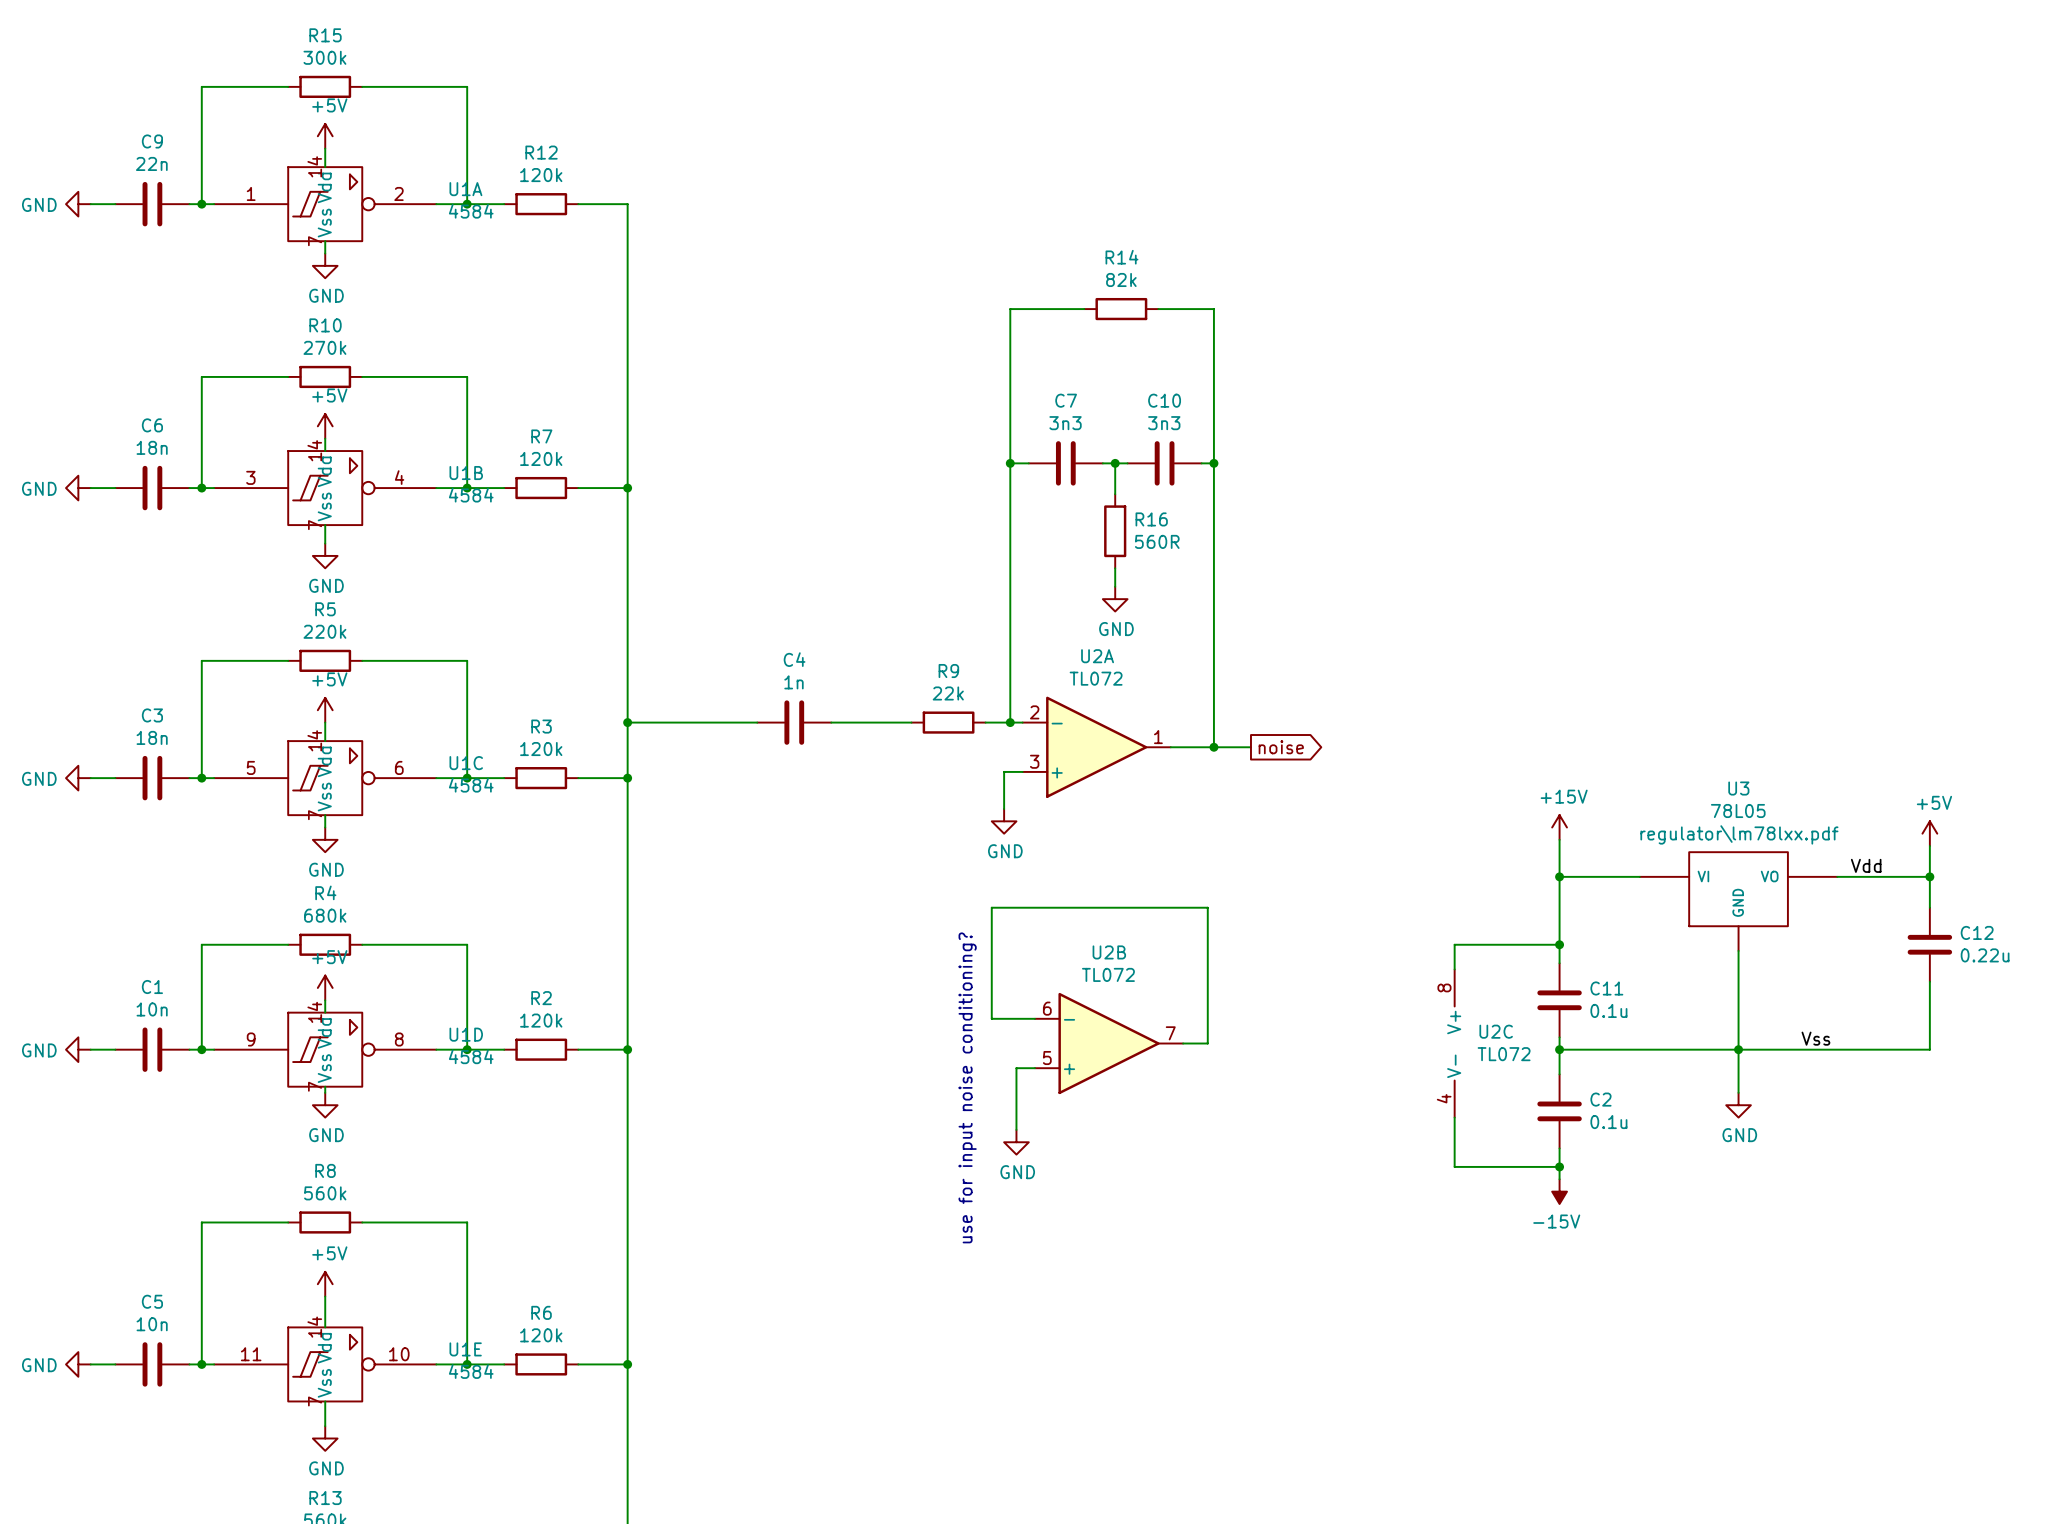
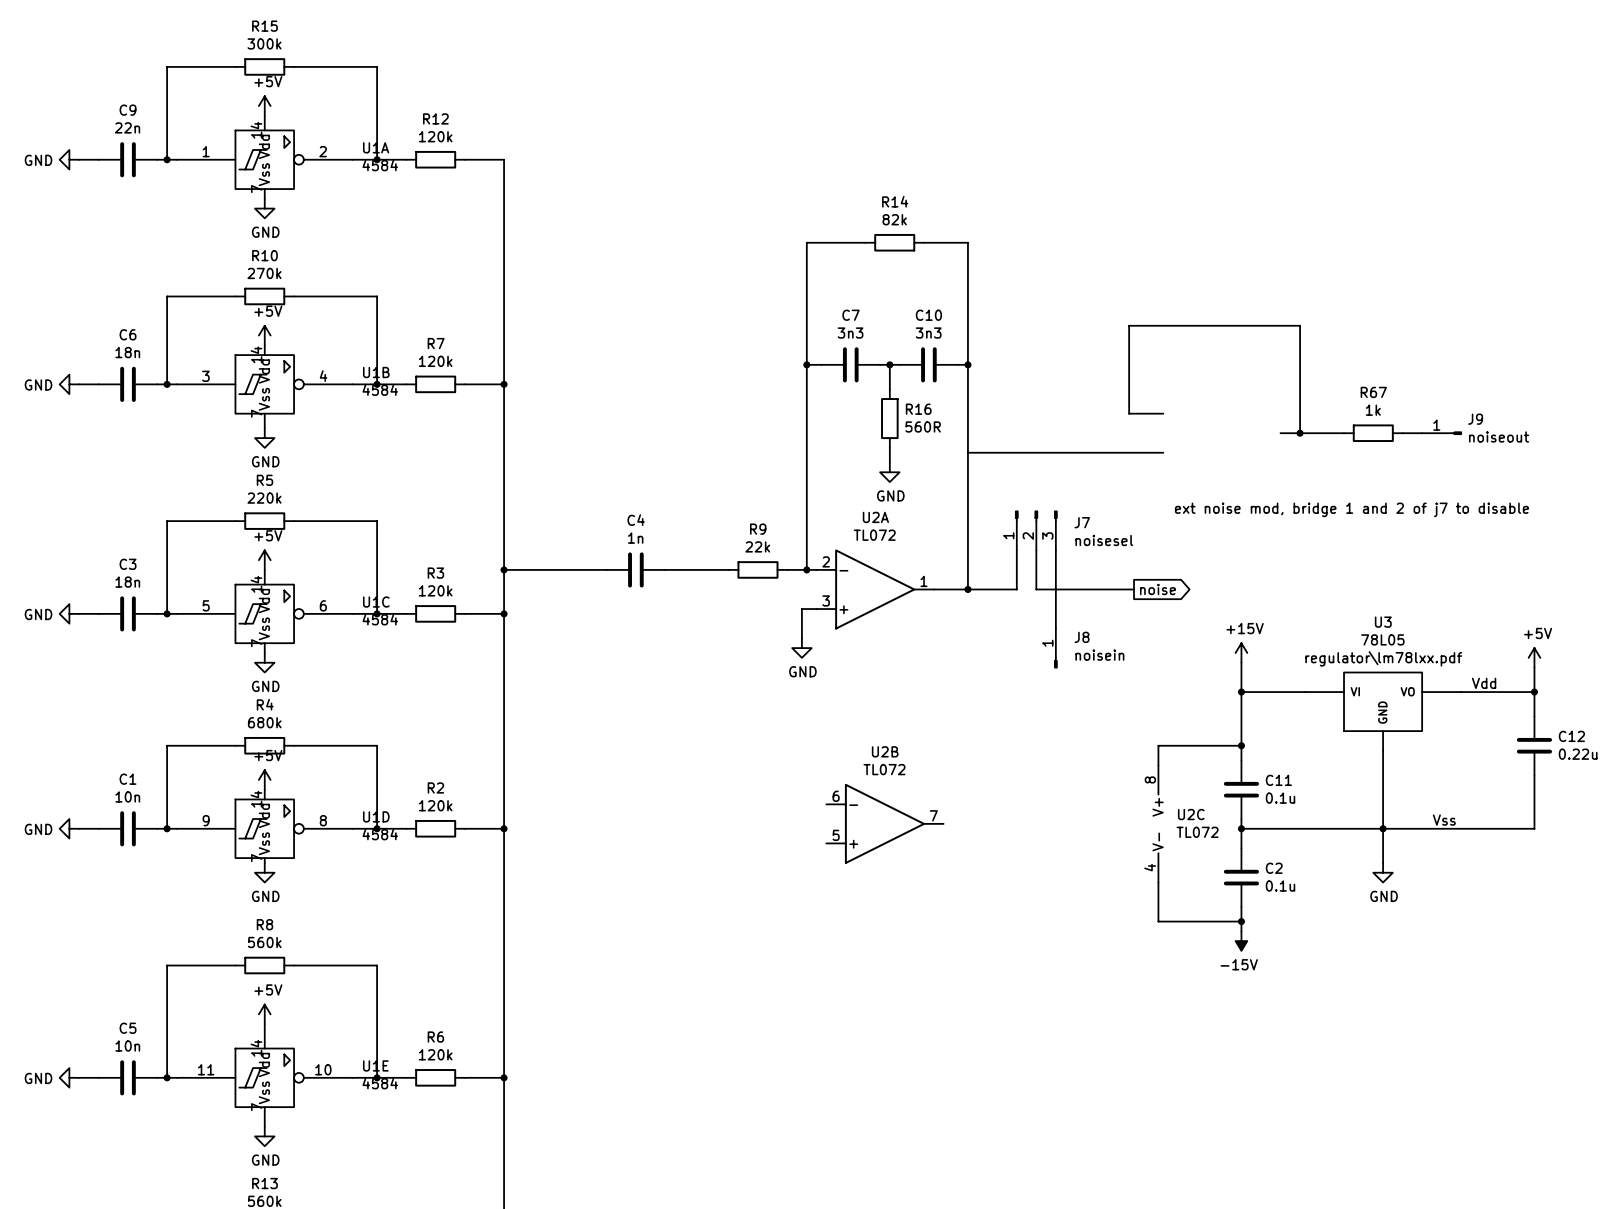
wire: none -> (1163, 413) (1129, 413) (1129, 325) (1300, 325) (1300, 433)
wire: none -> (1280, 433) (1344, 433)
junction: none -> (1300, 433)
R67: none -> 1k (1373, 433)
wire: none -> (1402, 433) (1422, 433)
J9: none -> noiseout (1441, 433)
wire: none -> (967, 452) (1163, 452)
text: none -> ext noise mod, bridge 1 and 2 of j7 to disable (1351, 509)
J7: none -> noisesel (1036, 530)
wire: none -> (1016, 550) (1016, 589) (997, 589)
wire: none -> (1036, 550) (1036, 589) (1134, 589)
wire: none -> (1055, 550) (1055, 628)
global label position: noise (1281, 747) -> noise (1157, 589)
J8: none -> noisein (1055, 648)
wire: (1034, 1018) (991, 1018) (991, 907) (1207, 907) (1207, 1043) (1183, 1043) -> none
wire: (1034, 1068) (1016, 1068) (1016, 1129) -> none
text: use for input noise conditioning? (967, 1087) -> none
power symbol: GND (1016, 1142) -> none

